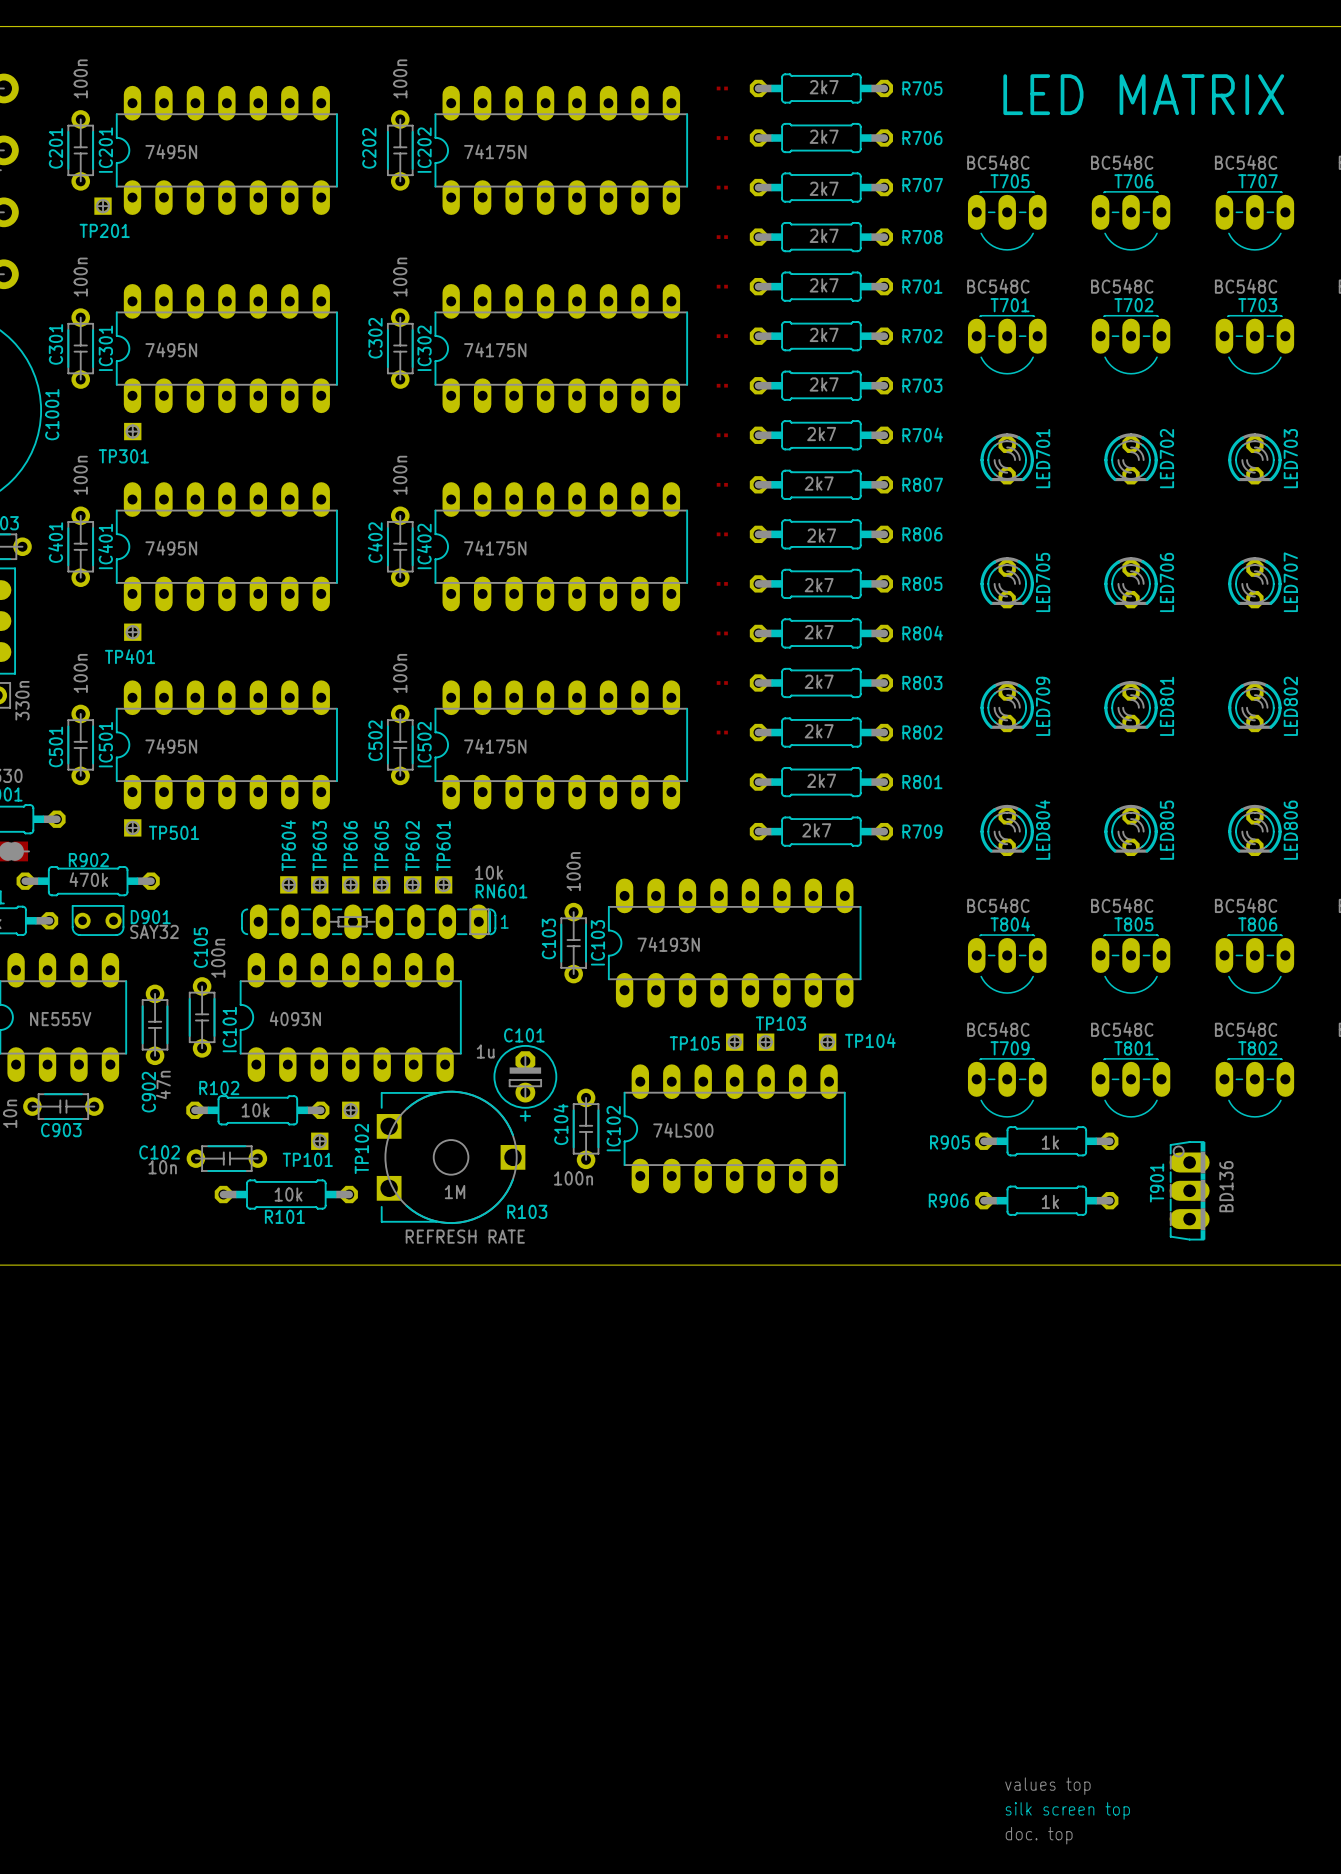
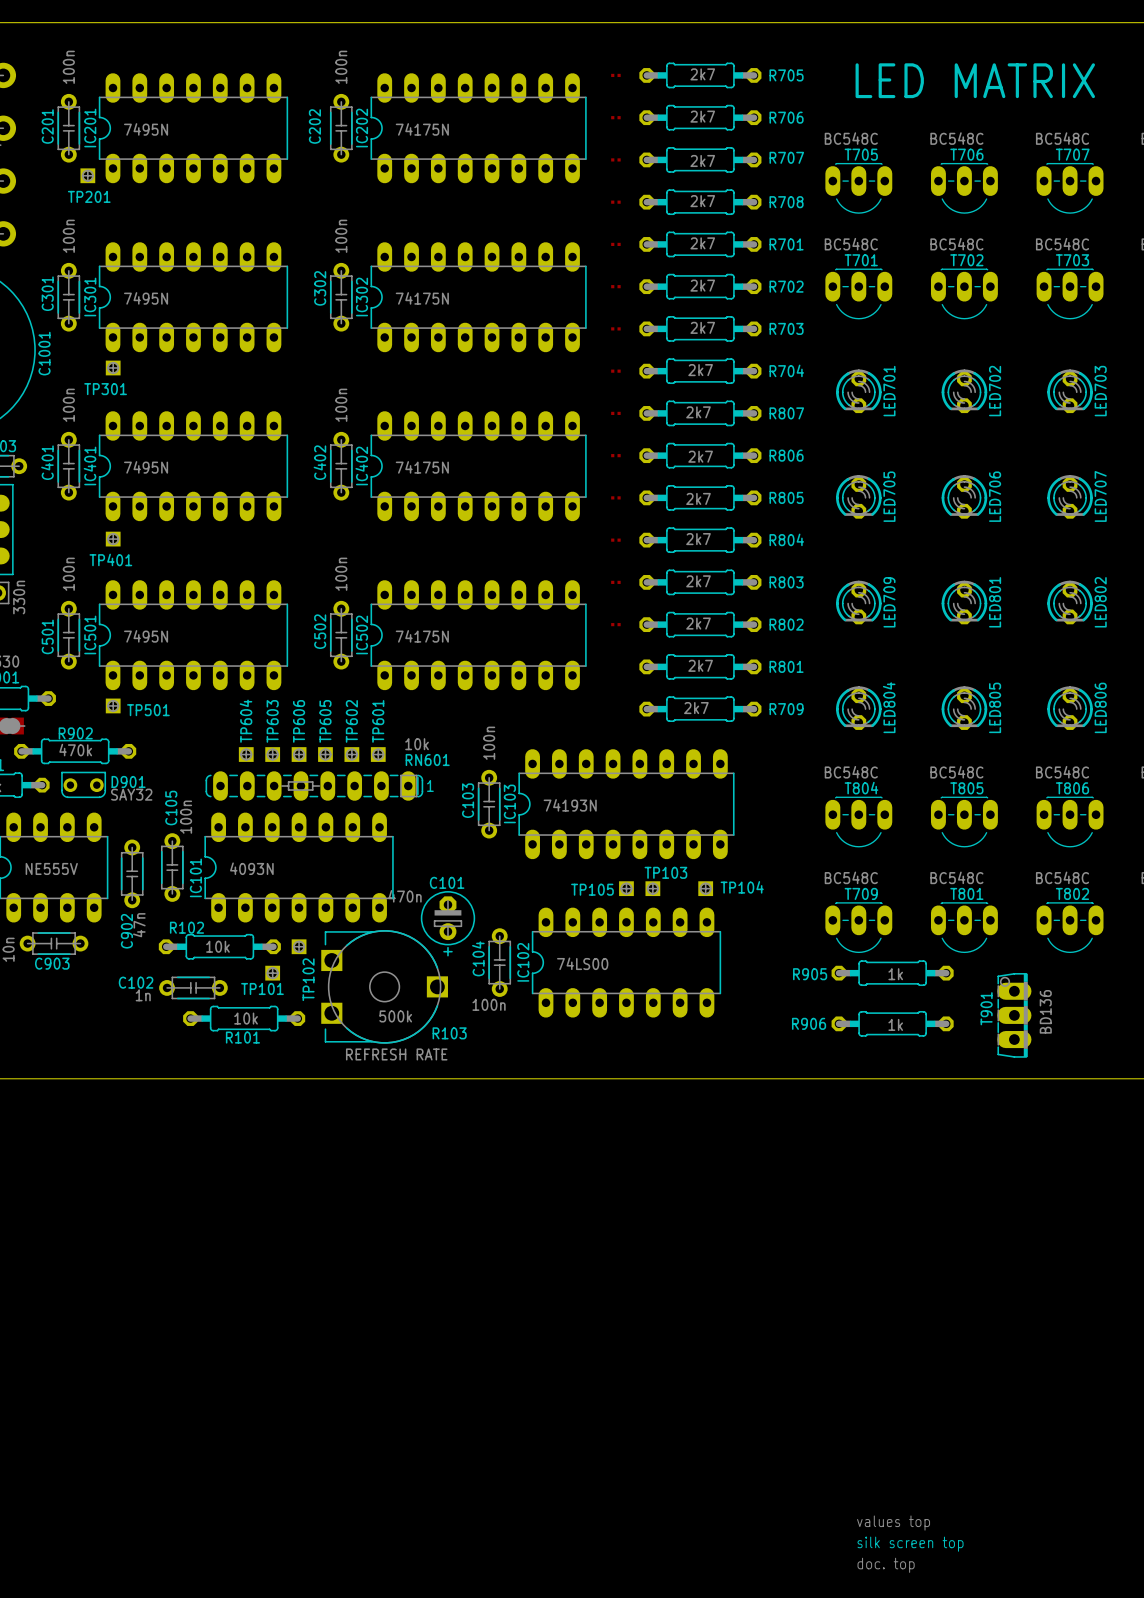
C101 value: 1u (485, 1051) -> 470n (405, 896)
C102 value: 10n (162, 1167) -> 1n (143, 995)
R103 value: 1M (455, 1192) -> 500k (395, 1016)

